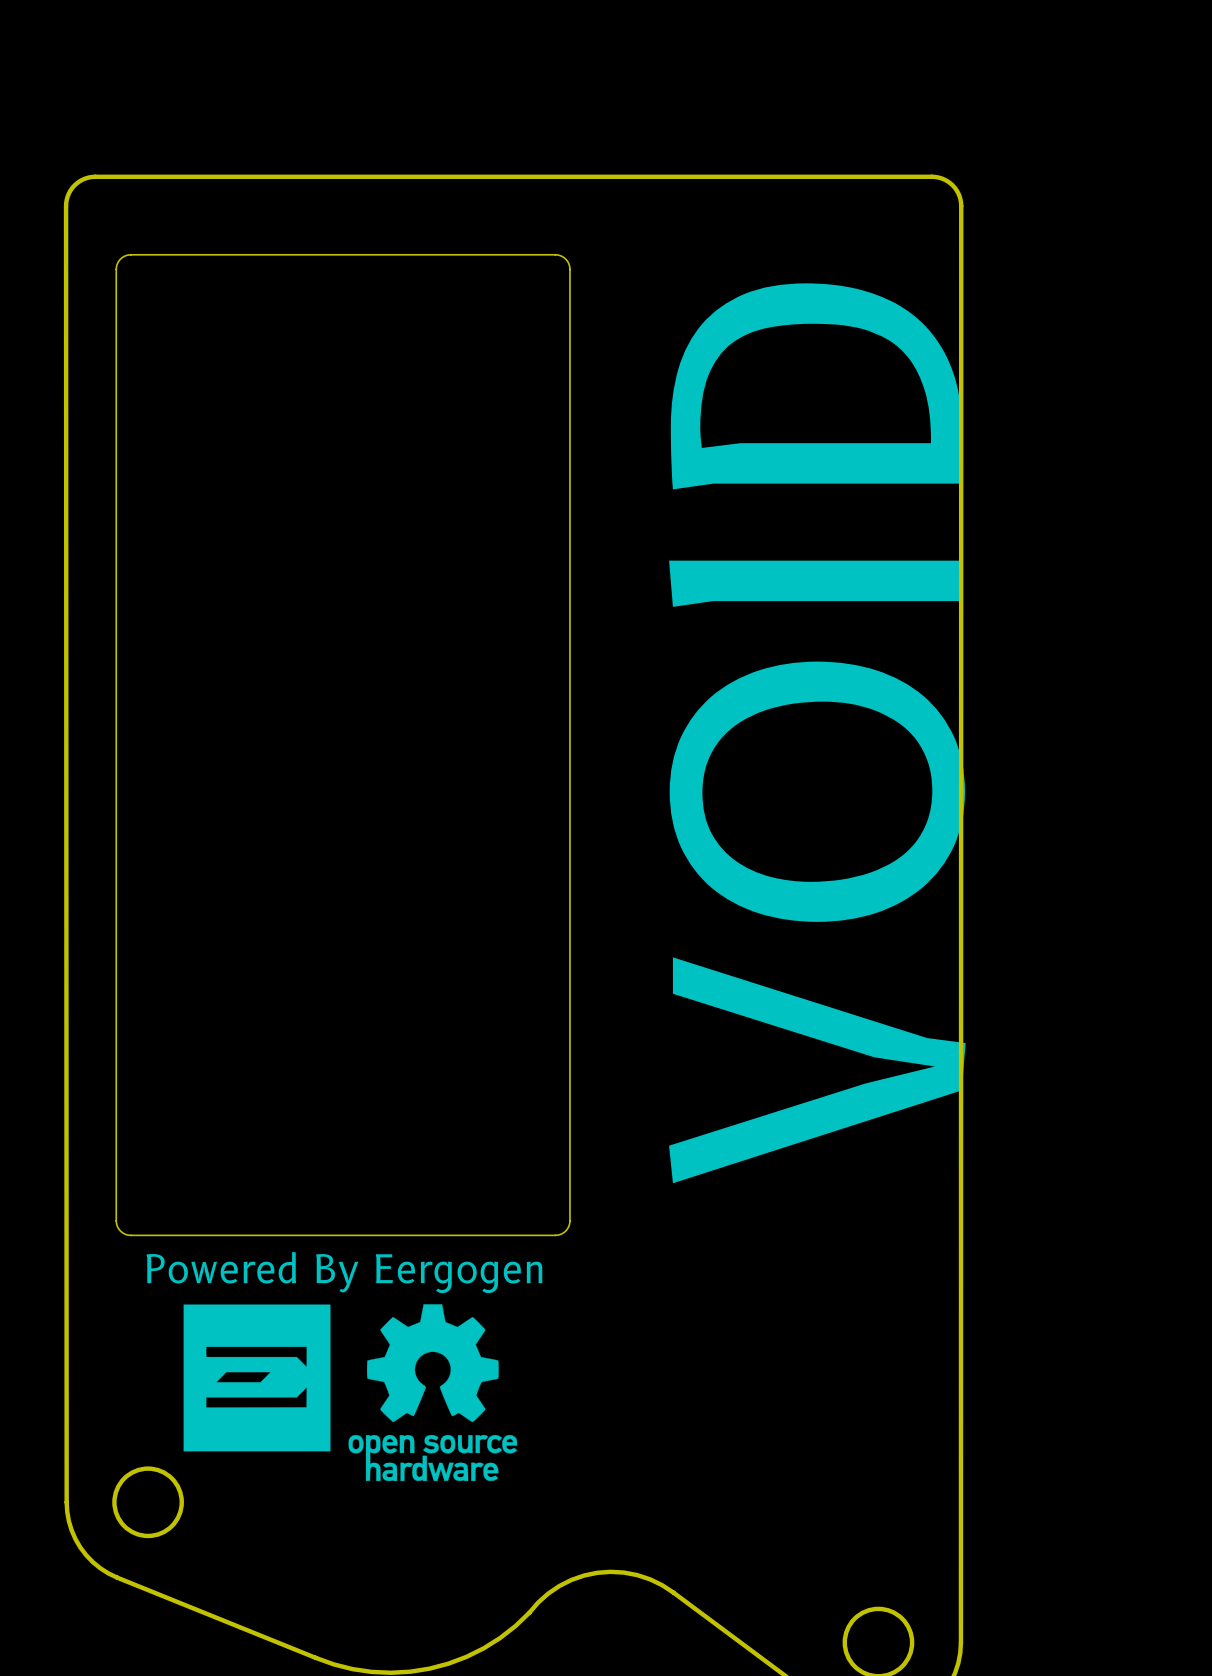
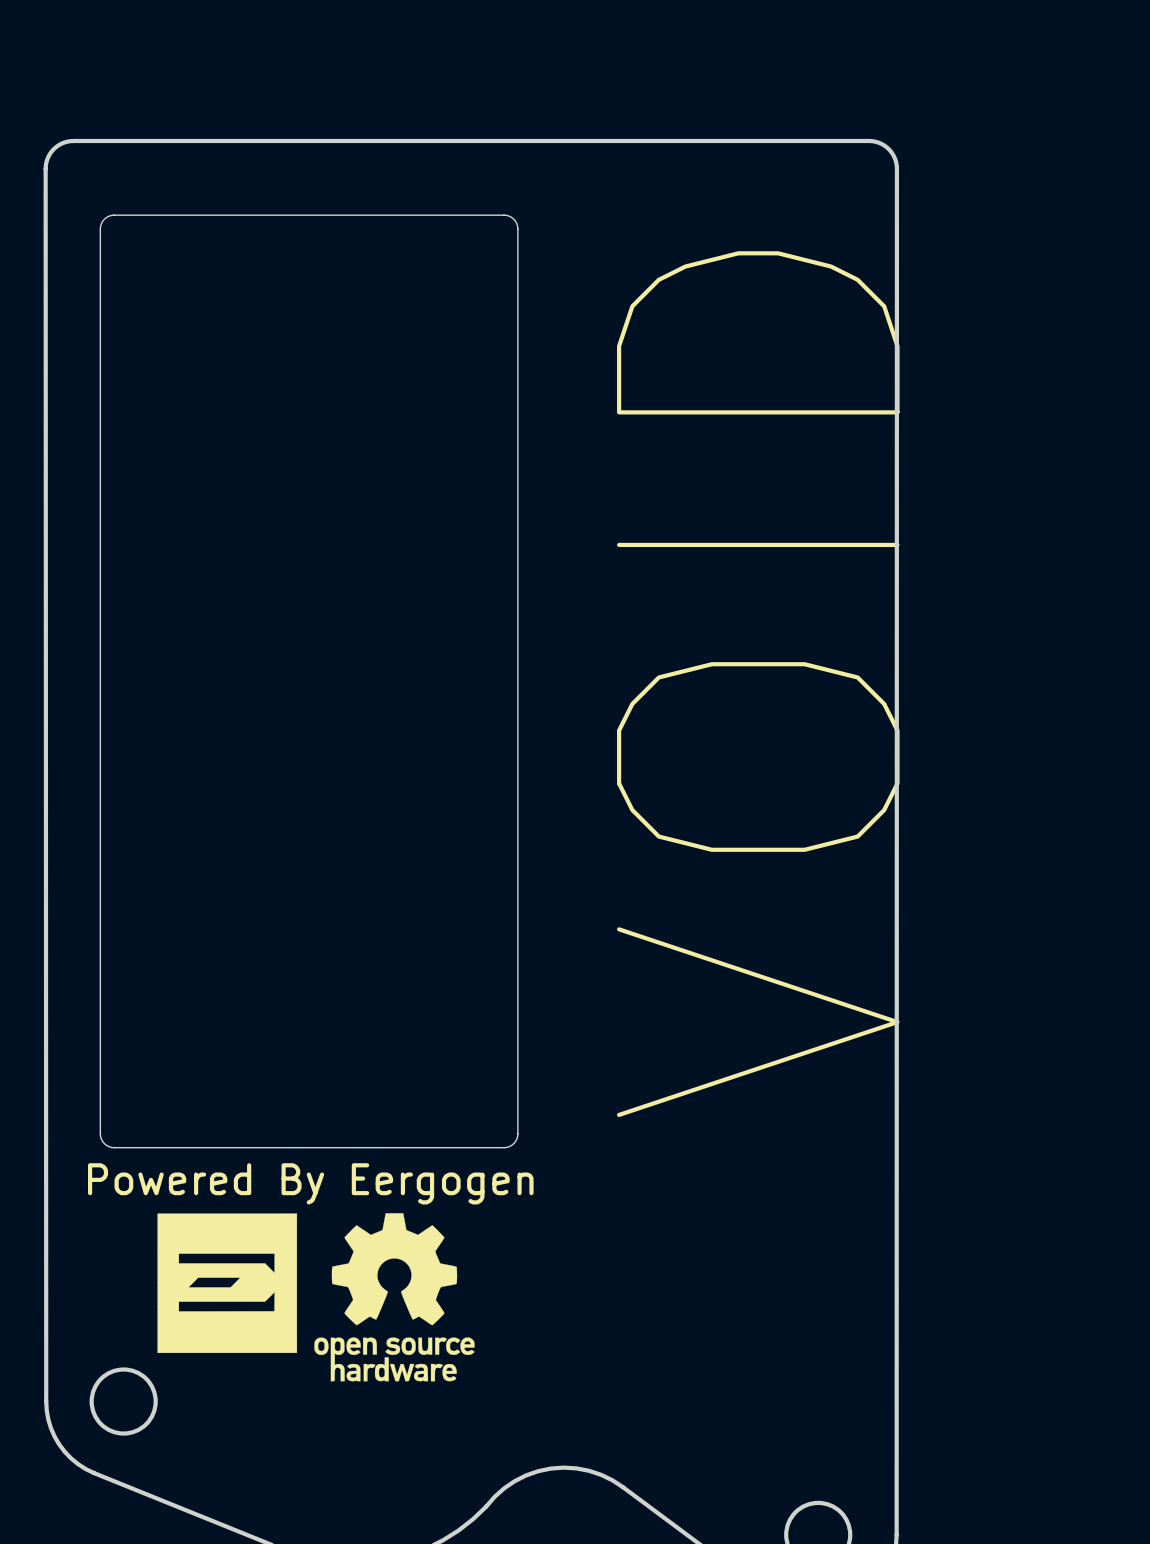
drawing shape: [115, 254, 571, 1237] -> [99, 214, 519, 1149]

